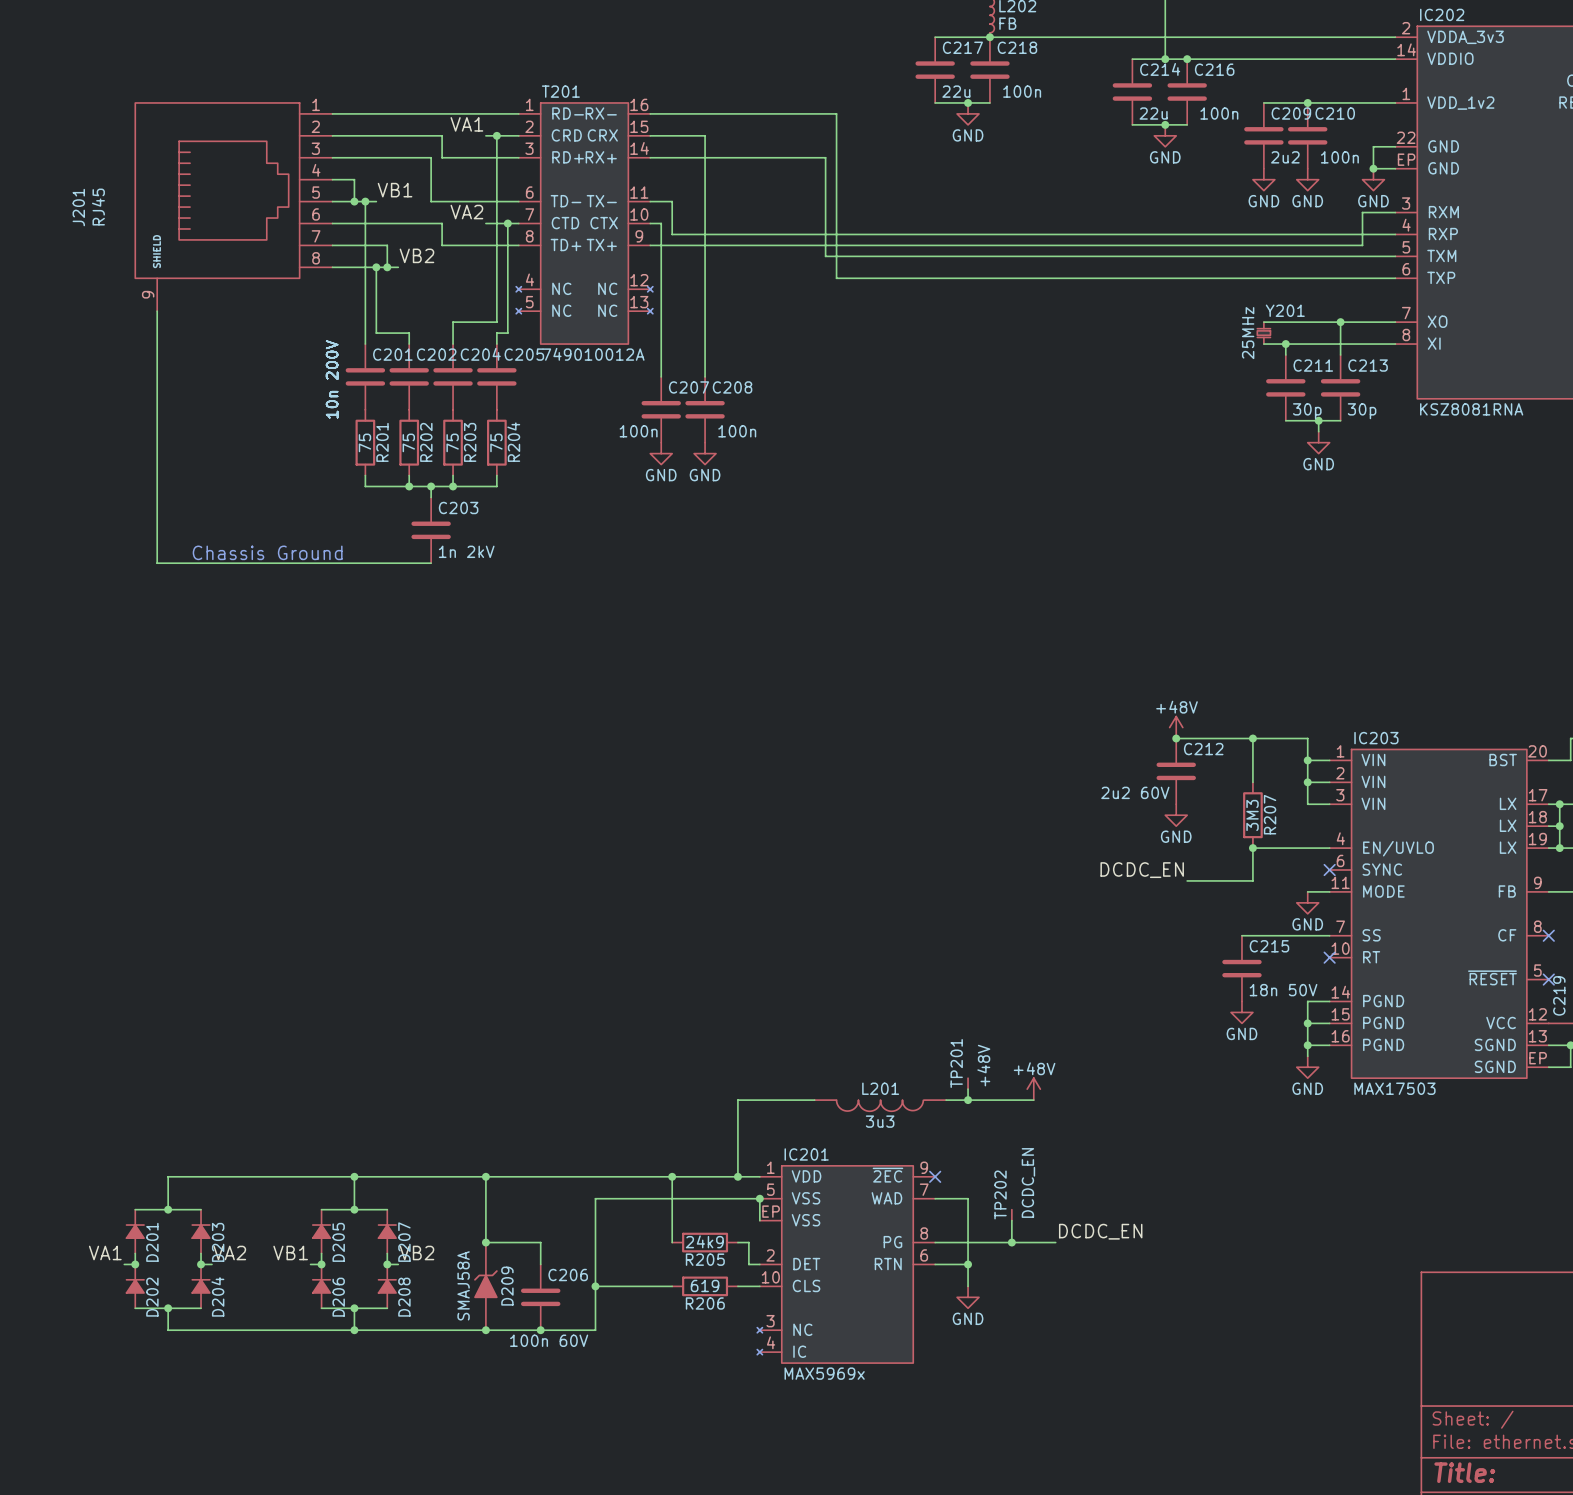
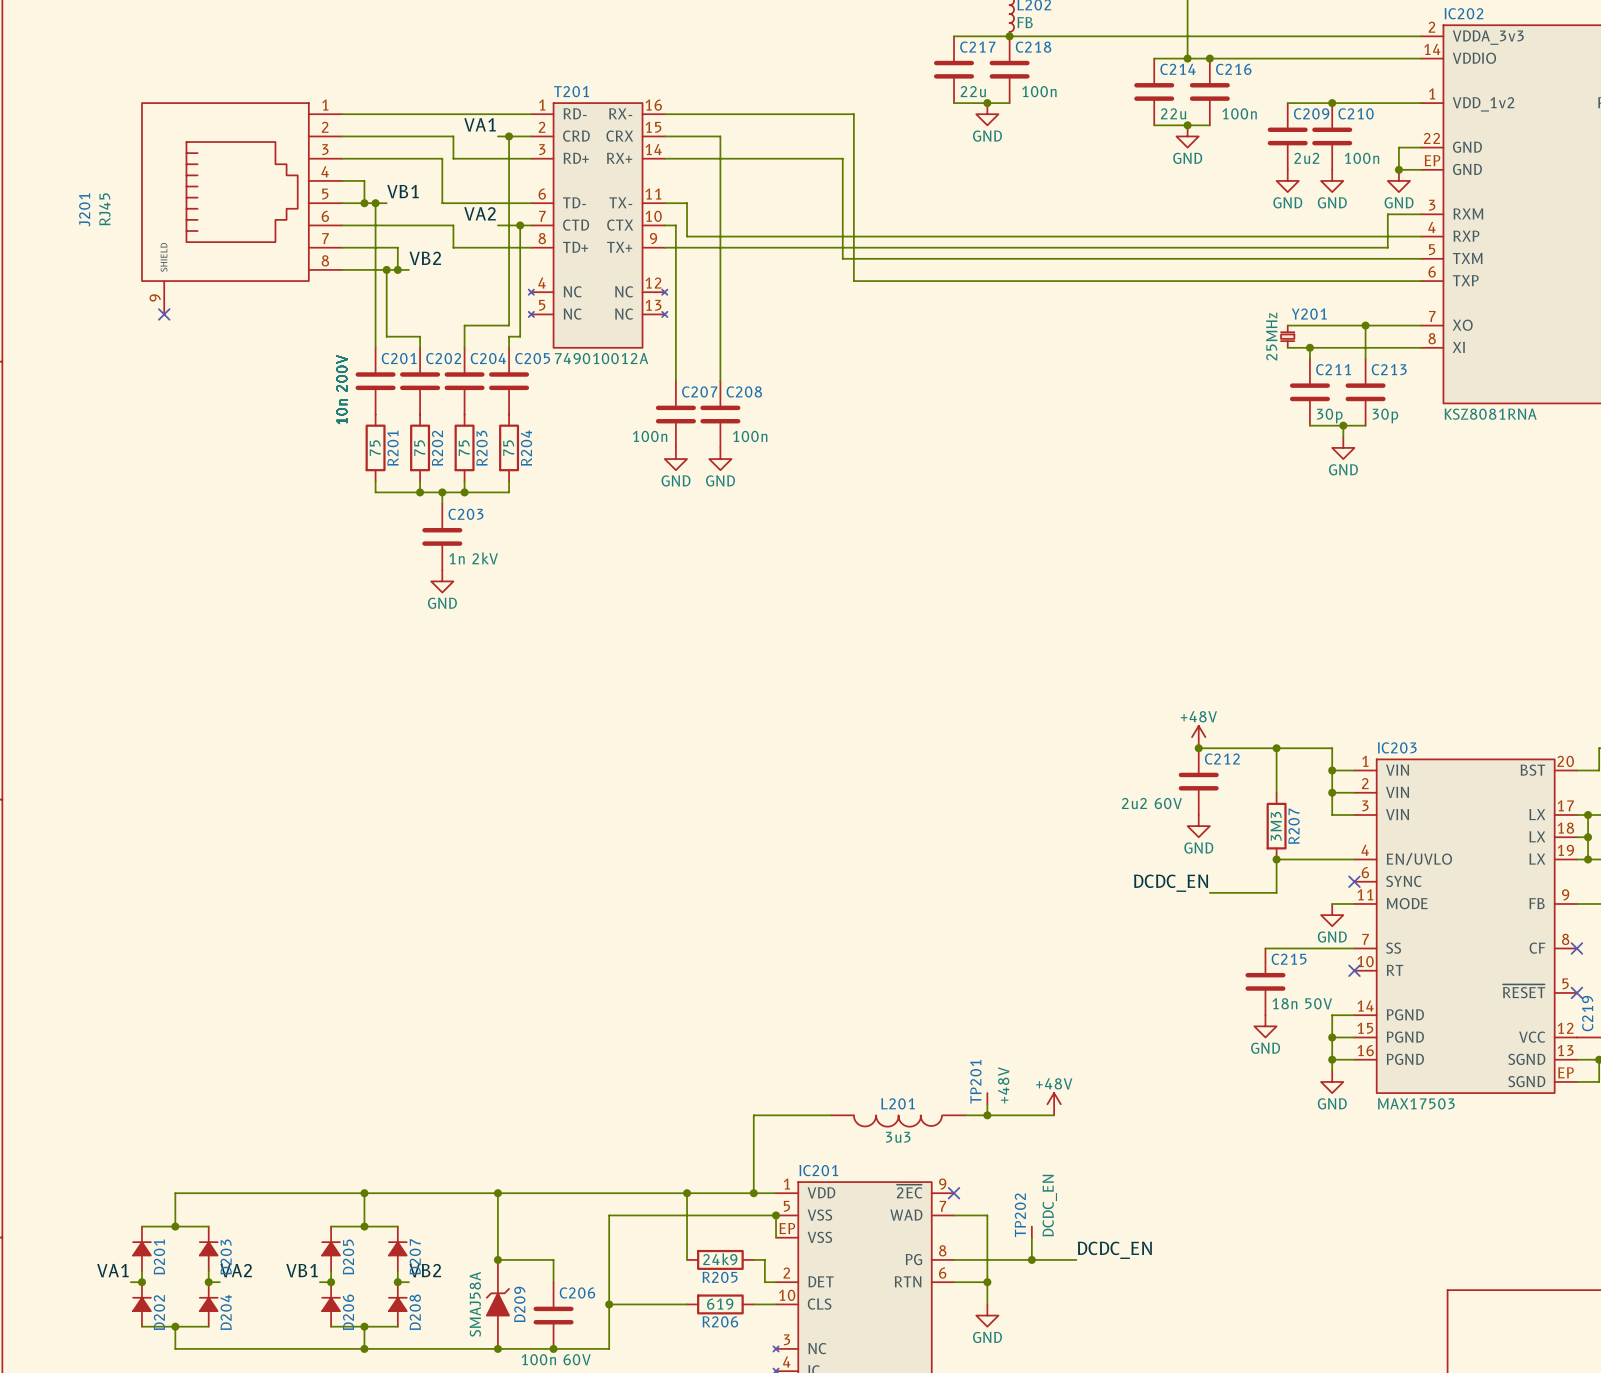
wire: (157, 311) (157, 563) (431, 563) -> none
no-connect mark: none -> (164, 314)
text: Chassis Ground (267, 552) -> none
power symbol: none -> GND (442, 581)

